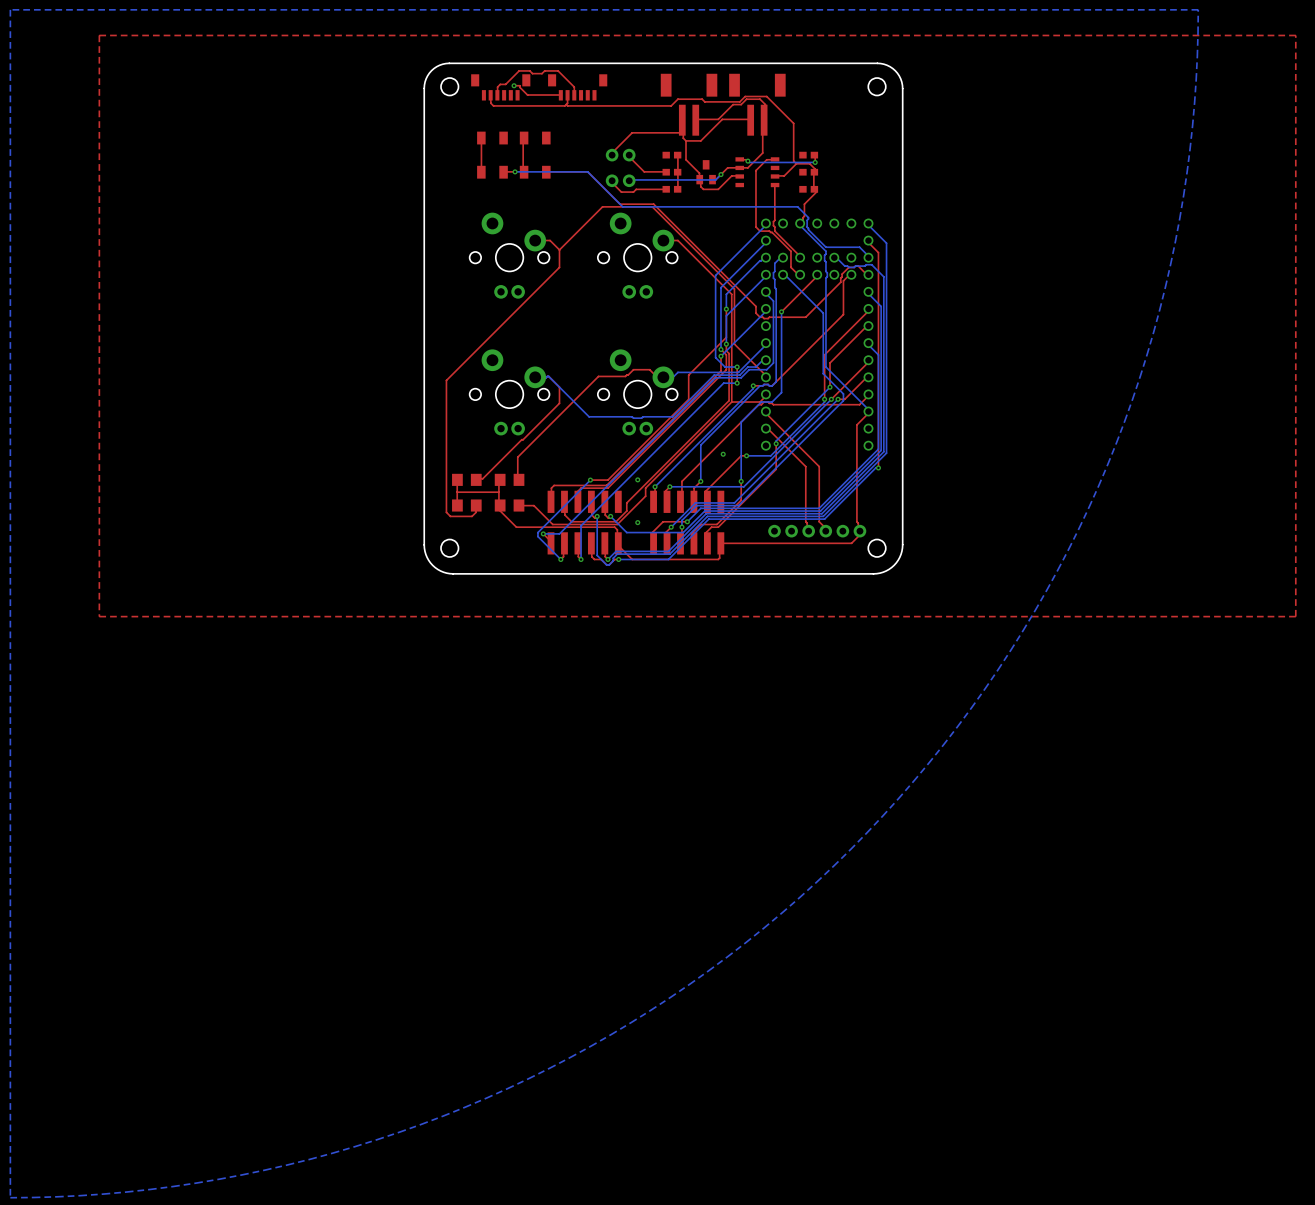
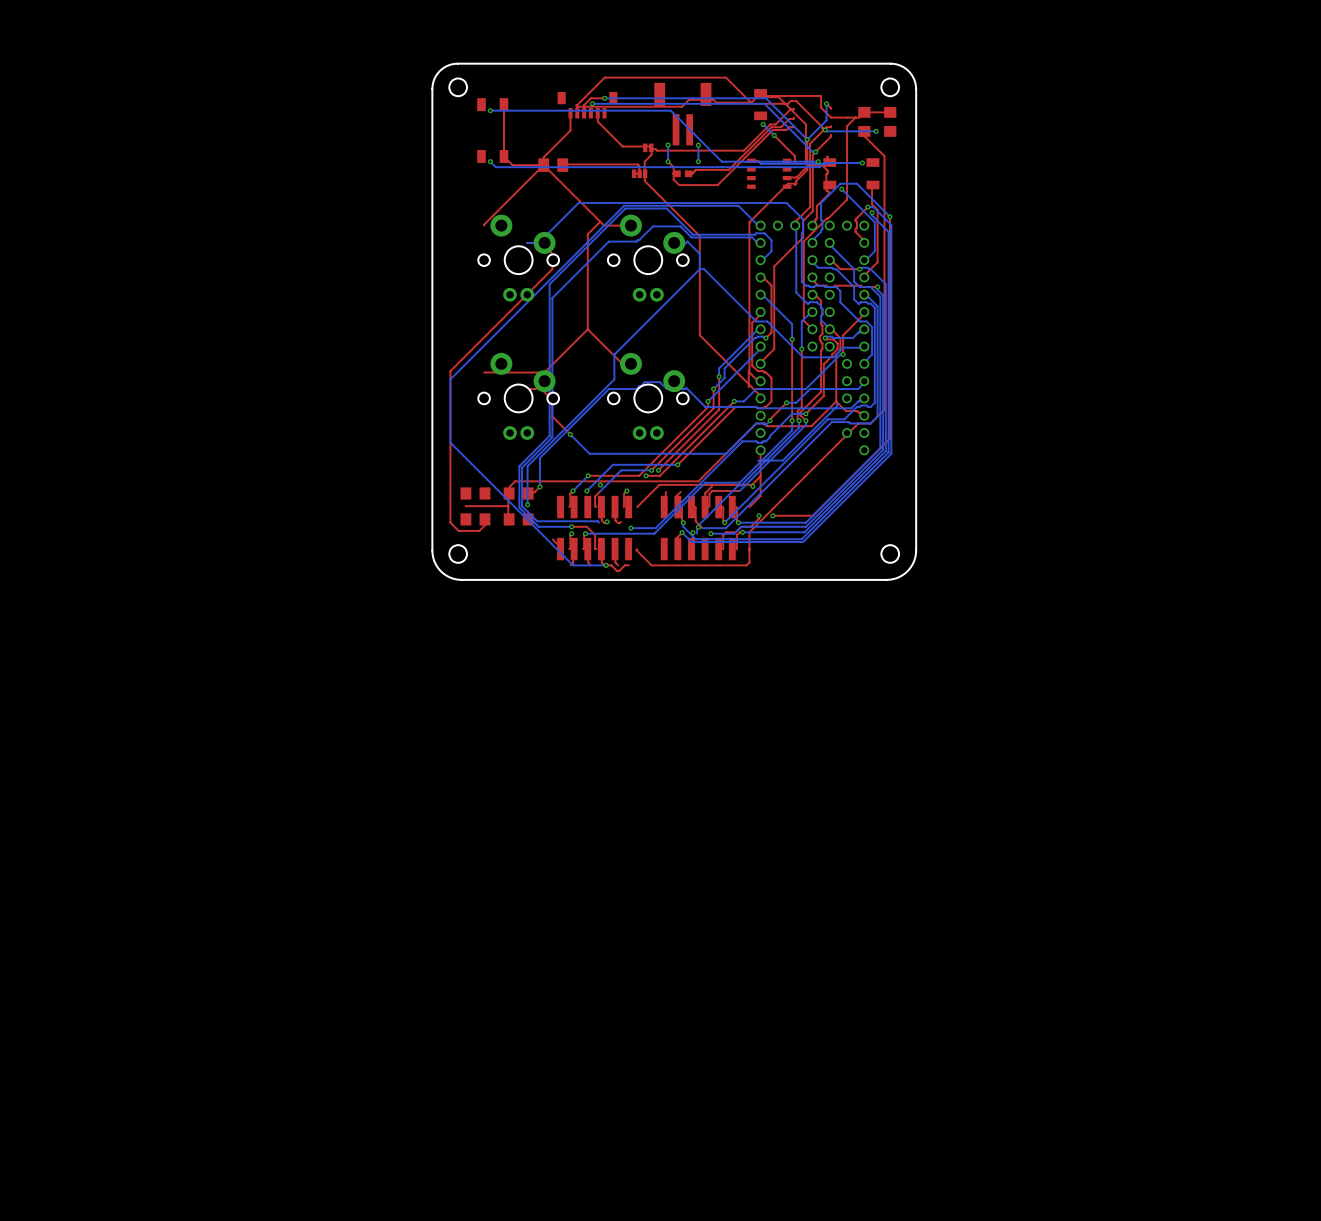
bottom zone outline: (1198, 9) (10, 9) (10, 1197) (126, 1192) (242, 1174) (355, 1146) (464, 1107) (570, 1057) (670, 997) (763, 928) (850, 849) (928, 763) (998, 669) (1057, 569) (1107, 464) (1147, 354) (1175, 241) (1192, 126) (1198, 9) -> none
top zone outline: (1295, 35) (99, 35) (99, 616) (1295, 616) (1295, 35) -> none
top track: (514, 85) (519, 85) (527, 95) (560, 95) -> none
via: (514, 85) -> none
part: (500, 87) -> none
part position: (577, 87) -> (587, 105)
top track: none -> (760, 93) (763, 95) (821, 95) (821, 107) (831, 117) (859, 117) (864, 112) (890, 112)
top track: (567, 95) (567, 103) (564, 105) (493, 105) (490, 103) (490, 95) -> none
top track: (574, 95) (574, 87) (558, 70) (544, 70) (542, 73) (519, 70) (505, 84) (500, 84) (497, 87) (497, 95) -> none
top track: none -> (604, 98) (590, 98) (584, 105) (584, 113)
bottom track: none -> (604, 98) (765, 98) (807, 139) (826, 120) (826, 103)
via: none -> (604, 98)
part: none -> (492, 104)
top track: none -> (503, 104) (503, 156) (512, 165) (543, 165)
bottom track: none -> (592, 103) (764, 103) (812, 152) (815, 152)
via: none -> (592, 103)
part: none -> (760, 104)
top track: none -> (826, 103) (831, 108)
via: none -> (826, 103)
part position: (689, 104) -> (682, 114)
part: (757, 104) -> none
top track: none -> (793, 108) (790, 109) (775, 124) (770, 124) (743, 150) (651, 149)
bottom track: none -> (490, 110) (670, 110) (721, 161) (818, 161)
via: none -> (490, 110)
top track: none -> (570, 113) (570, 130) (543, 157) (543, 165)
top track: none -> (577, 113) (577, 105) (604, 77) (726, 77) (752, 103) (788, 103) (790, 101) (796, 101) (823, 129)
top track: none -> (597, 113) (597, 121) (622, 146) (651, 147)
top track: none -> (793, 117) (789, 118) (781, 127) (771, 127) (728, 169) (695, 169)
top track: none -> (855, 117) (847, 126) (847, 199) (803, 241) (803, 320) (812, 329)
top track: (695, 120) (718, 119) (733, 104) (741, 104) (746, 99) (760, 99) (765, 104) (765, 119) (762, 122) (762, 153) (747, 167) (727, 167) (715, 179) (712, 179) -> none
top track: (750, 120) (722, 119) (700, 140) (686, 140) -> none
part: none -> (864, 121)
part: none -> (890, 121)
bottom track: none -> (763, 124) (774, 135)
via: none -> (763, 124)
top track: none -> (793, 126) (786, 129) (772, 129) (717, 185) (679, 185) (673, 179) (673, 167) (668, 161)
top track: none -> (831, 126) (826, 127) (810, 143) (810, 207) (796, 220) (795, 225)
bottom track: none -> (825, 129) (876, 131)
via: none -> (825, 129)
top track: none -> (864, 131) (865, 136) (884, 156) (884, 409) (870, 423) (858, 423) (850, 431) (847, 431) (845, 435) (749, 532) (749, 562) (746, 565) (651, 565) (637, 549)
via: none -> (876, 131)
top track: none -> (831, 134) (812, 154) (812, 211) (803, 220) (803, 237) (774, 266) (774, 349) (760, 363)
top track: none -> (774, 135) (794, 156) (795, 162)
via: none -> (774, 135)
top track: (481, 138) (481, 172) -> none
part: (492, 138) -> none
top track: (524, 138) (524, 172) -> none
part: (535, 138) -> none
top track: none -> (807, 139) (807, 169) (796, 180) (795, 184) (788, 183) (749, 222) (749, 372) (760, 381)
via: none -> (807, 139)
top track: (686, 140) (686, 159) (699, 173) (700, 186) (703, 189) (718, 189) (731, 175) (739, 176) -> none
top track: (686, 140) (683, 138) (683, 120) (682, 120) (683, 132) (632, 132) (612, 155) -> none
bottom track: none -> (668, 145) (668, 161)
via: none -> (668, 145)
bottom track: none -> (698, 145) (698, 161)
via: none -> (698, 145)
part: none -> (648, 147)
top track: none -> (651, 149) (651, 154) (644, 161) (644, 180) (699, 236) (699, 335) (760, 395) (760, 398)
via: none -> (815, 152)
part: none -> (492, 156)
part: (620, 155) -> none
top track: (629, 155) (644, 171) (666, 172) -> none
part: (671, 155) -> none
top track: (677, 155) (677, 189) -> none
part: (808, 155) -> none
top track: (775, 159) (766, 159) (755, 170) (755, 227) (760, 231) (772, 232) (790, 251) (790, 267) (800, 274) -> (877, 287) (818, 285) (812, 277)
bottom track: none -> (490, 161) (495, 167) (819, 167) (823, 163) (862, 163)
via: none -> (490, 161)
via: none -> (668, 161)
via: none -> (698, 161)
via: none -> (818, 161)
via: (747, 161) -> none
via: none -> (862, 163)
via: (815, 162) -> none
top track: none -> (543, 165) (484, 225)
top track: none -> (543, 165) (604, 225) (630, 225)
part: none -> (553, 165)
top track: none -> (562, 165) (637, 164) (639, 173)
top track: none -> (695, 169) (692, 172) (692, 173) (695, 169)
top track: (515, 171) (503, 172) -> none
bottom track: (515, 171) (587, 171) (622, 206) (797, 206) (808, 217) (808, 229) (825, 247) (859, 247) (868, 257) -> none
via: (515, 171) -> none
part: (492, 172) -> none
part: (535, 172) -> none
top track: (546, 172) (587, 171) (620, 204) (653, 204) (755, 306) (755, 313) (764, 318) (805, 317) (840, 282) (842, 274) (848, 267) (858, 266) (868, 274) -> none
part: none -> (639, 173)
part: (706, 172) -> none
part: (808, 172) -> none
part: none -> (829, 173)
part: none -> (872, 173)
bottom track: (720, 174) (715, 179) (629, 180) -> none
via: (720, 174) -> none
top track: (612, 180) (621, 192) (633, 192) (636, 189) (666, 189) -> none
part: (620, 180) -> none
top track: (775, 185) (774, 231) (800, 257) -> none
bottom track: none -> (841, 189) (874, 222) (874, 251) (864, 260)
via: none -> (841, 189)
part: (671, 189) -> none
part: (808, 189) -> none
top track: none -> (867, 207) (855, 219) (855, 231) (864, 242)
bottom track: none -> (867, 207) (873, 207) (891, 225) (891, 453) (803, 541) (691, 541) (683, 533)
via: none -> (867, 207)
bottom track: none -> (872, 212) (872, 215) (888, 231) (888, 452) (801, 539) (695, 539) (683, 526) (683, 522)
via: none -> (872, 212)
top track: none -> (889, 216) (889, 438) (812, 515) (772, 515)
bottom track: none -> (889, 216) (856, 183) (840, 183) (821, 203) (822, 229) (812, 242)
via: none -> (889, 216)
top track: none -> (600, 221) (587, 234) (587, 329)
bottom track: none -> (760, 225) (757, 225) (738, 205) (624, 205) (450, 379) (450, 442) (573, 565) (606, 565)
bottom track: (765, 223) (715, 275) (715, 357) (725, 367) (737, 367) -> none
bottom track: none -> (795, 225) (796, 292) (807, 303) (816, 302) (821, 306) (821, 320) (829, 329)
bottom track: (800, 223) (825, 251) (825, 367) (868, 411) -> none
bottom track: (868, 223) (886, 243) (886, 453) (823, 516) (707, 516) (669, 554) (617, 554) (613, 560) (606, 564) (597, 555) (597, 516) -> none
top track: none -> (527, 242) (540, 241) (552, 253) (552, 269) (450, 371) (450, 522) (458, 530) (479, 530) (484, 525) (484, 519)
bottom track: none -> (527, 242) (538, 242) (578, 203) (786, 203) (803, 219) (801, 281) (810, 287) (836, 287) (840, 291) (840, 302) (859, 321) (866, 321) (872, 327) (872, 354) (864, 363)
top track: (535, 240) (550, 240) (559, 249) -> none
top track: (663, 240) (677, 240) (731, 294) (731, 402) -> none
bottom track: none -> (674, 242) (684, 244) (687, 241) (699, 253) (699, 269)
bottom track: none -> (760, 242) (752, 237) (691, 237) (680, 226) (652, 226) (636, 241) (608, 241) (552, 298) (552, 437) (522, 467) (522, 506) (537, 521) (599, 522)
bottom track: (765, 240) (720, 287) (720, 349) -> none
bottom track: none -> (829, 242) (854, 269) (854, 281) (859, 287) (870, 287) (880, 296) (880, 448) (805, 522) (738, 522)
top track: (868, 240) (878, 252) (878, 467) -> none
top track: (559, 249) (559, 267) (446, 380) (446, 512) (450, 516) (472, 516) (476, 512) (476, 505) -> none
top track: (559, 249) (602, 206) (652, 206) (734, 288) (734, 344) (765, 377) -> none
bottom track: none -> (760, 260) (771, 251) (771, 240) (764, 233) (692, 234) (666, 208) (625, 208) (549, 284) (549, 435) (519, 466) (519, 507) (538, 526) (571, 526)
bottom track: (765, 257) (760, 260) (726, 294) (726, 309) -> none
bottom track: (783, 257) (774, 263) (773, 272) (776, 288) (776, 381) (772, 385) (760, 385) (700, 445) (700, 481) -> none
bottom track: none -> (812, 260) (818, 267) (836, 269) (854, 287) (854, 299) (858, 303) (866, 302) (874, 307) (874, 402) (870, 406) (856, 406) (844, 419) (827, 419) (724, 522)
top track: none -> (829, 260) (840, 269) (859, 269)
bottom track: (834, 257) (848, 267) (871, 264) (883, 276) (883, 451) (821, 513) (706, 513) (668, 551) (616, 551) (607, 559) -> none
bottom track: none -> (699, 269) (614, 354) (614, 379) (527, 466) (527, 504)
bottom track: none -> (699, 269) (703, 269) (756, 321) (767, 321) (803, 357) (833, 357) (843, 347) (864, 346)
bottom track: none -> (859, 269) (870, 269) (885, 284) (885, 451) (804, 532) (742, 532)
via: none -> (859, 269)
top track: none -> (760, 277) (771, 285) (771, 332) (765, 338)
bottom track: (765, 274) (726, 315) (726, 344) -> none
bottom track: (783, 274) (823, 313) (823, 373) (843, 393) (843, 400) (738, 505) (696, 505) (681, 520) (681, 527) -> none
top track: (817, 274) (781, 311) -> none
top track: (851, 274) (843, 280) (843, 314) (772, 385) (753, 385) -> (864, 277) (877, 262) (877, 209) (872, 204) (872, 184)
bottom track: none -> (877, 287) (877, 289) (883, 295) (883, 449) (805, 526) (741, 526) (734, 533) (710, 533)
via: none -> (877, 287)
bottom track: none -> (760, 294) (792, 324) (792, 339)
bottom track: (765, 291) (773, 301) (773, 362) (766, 369) (749, 369) (741, 377) (715, 377) (559, 533) (543, 533) -> none
top track: none -> (812, 294) (821, 300) (822, 309) (822, 333) (819, 336) (822, 343) (821, 391) (800, 412) (800, 415) (805, 420)
bottom track: none -> (864, 294) (877, 306) (877, 416) (870, 423) (832, 422) (726, 528) (702, 528)
bottom track: (868, 291) (881, 306) (881, 450) (820, 511) (704, 511) (683, 532) (626, 532) (610, 516) -> none
top track: none -> (760, 312) (752, 322) (752, 365) (757, 371) (763, 371) (771, 377) (771, 401) (763, 408) (735, 406) (677, 464)
bottom track: (765, 308) (765, 311) (720, 356) -> none
bottom track: none -> (812, 312) (801, 321) (801, 349)
top track: none -> (864, 312) (843, 335) (843, 354)
top track: (868, 308) (824, 354) (824, 399) -> none
top track: (726, 309) (726, 337) (688, 375) (688, 399) (607, 480) (590, 480) -> none
via: (726, 309) -> none
bottom track: (781, 311) (781, 392) (772, 402) (761, 402) (741, 422) (741, 481) -> none
via: (781, 311) -> none
top track: none -> (587, 329) (630, 372)
top track: none -> (587, 329) (544, 372) (484, 372)
bottom track: none -> (760, 329) (757, 329) (719, 368) (719, 376)
top track: none -> (829, 329) (840, 338) (840, 350) (836, 354) (836, 401)
bottom track: none -> (864, 329) (852, 338) (825, 338)
top track: (868, 326) (830, 362) (830, 387) -> none
bottom track: none -> (765, 338) (754, 338) (724, 368) (724, 377) (713, 389)
via: none -> (765, 338)
part: none -> (812, 337)
top track: none -> (825, 338) (833, 339) (837, 343) (837, 349) (823, 364) (823, 395) (805, 413)
via: none -> (825, 338)
part: (817, 334) -> none
top track: none -> (792, 339) (792, 420)
via: none -> (792, 339)
bottom track: none -> (760, 346) (760, 349) (708, 401)
bottom track: (765, 343) (738, 372) (677, 372) (673, 376) (663, 377) -> none
bottom track: (868, 343) (878, 354) (878, 449) (819, 508) (700, 508) (687, 521) -> none
top track: (726, 344) (726, 350) (729, 353) (729, 400) (626, 502) (626, 511) (616, 521) (571, 521) (564, 515) (564, 501) -> none
via: (726, 344) -> none
top track: none -> (801, 349) (801, 406) (797, 411) (799, 420)
via: none -> (801, 349)
top track: (720, 349) (726, 354) (726, 369) (607, 488) (581, 488) (578, 490) (577, 501) -> none
via: (720, 349) -> none
bottom track: none -> (843, 354) (840, 354) (805, 389) (756, 389) (743, 401) (734, 401)
via: none -> (843, 354)
top track: (720, 356) (720, 371) (606, 485) (554, 485) (551, 488) (551, 501) -> none
via: (720, 356) -> none
bottom track: (765, 360) (762, 360) (755, 367) (747, 367) (739, 375) (714, 375) (672, 416) (589, 416) (548, 376) (535, 377) -> none
top track: (868, 360) (831, 399) -> none
via: (737, 367) -> none
top track: none -> (719, 376) (719, 409) (658, 470)
via: none -> (719, 376)
top track: (535, 377) (548, 376) (559, 387) (559, 403) (482, 478) (476, 479) -> none
top track: (663, 377) (656, 376) (649, 369) (633, 369) (625, 376) (598, 376) (517, 457) (518, 479) -> none
bottom track: none -> (864, 381) (858, 389) (810, 389) (796, 402) (786, 402)
top track: (868, 377) (844, 399) (838, 399) -> none
bottom track: (737, 383) (723, 383) (581, 525) (581, 559) -> none
via: (737, 383) -> none
top track: none -> (527, 389) (535, 389) (538, 386) (552, 400) (552, 416) (570, 434)
top track: none -> (713, 389) (713, 408) (651, 470)
via: none -> (713, 389)
bottom track: (753, 385) (753, 388) (655, 486) -> none
via: (753, 385) -> none
bottom track: (830, 387) (776, 441) (776, 443) -> none
via: (830, 387) -> none
top track: (765, 394) (760, 402) (731, 402) -> none
bottom track: none -> (864, 398) (851, 408) (705, 406) (686, 387) (666, 389) (659, 382) (644, 382) (636, 389) (608, 389) (540, 457) (540, 486)
top track: (868, 394) (859, 404) (773, 404) (768, 402) (758, 404) (681, 481) (680, 501) -> none
top track: none -> (708, 401) (708, 406) (639, 475) (588, 475)
via: none -> (708, 401)
top track: none -> (734, 401) (659, 475) (646, 475)
via: none -> (734, 401)
top track: none -> (836, 401) (845, 411) (856, 411) (864, 415)
top track: none -> (836, 401) (811, 426) (767, 426) (764, 423) (756, 423) (698, 481) (515, 481) (509, 486) (508, 493) (509, 519)
top track: none -> (786, 402) (770, 420)
via: none -> (786, 402)
via: (824, 399) -> none
bottom track: (831, 399) (743, 486) (669, 486) -> none
via: (831, 399) -> none
bottom track: (838, 399) (734, 502) (695, 502) (671, 527) -> none
via: (838, 399) -> none
top track: (731, 402) (645, 488) (645, 496) (617, 524) (552, 524) (533, 505) (518, 505) -> none
bottom track: none -> (805, 413) (792, 413) (765, 441) (742, 441) (655, 528) (630, 528)
via: none -> (805, 413)
top track: (765, 411) (819, 466) (819, 521) (825, 531) -> none
top track: (868, 411) (856, 424) (856, 521) (859, 531) (859, 535) (851, 543) (720, 543) (718, 559) (632, 559) (617, 544) (617, 529) (614, 527) (516, 527) (500, 511) (500, 479) -> none
bottom track: none -> (770, 420) (765, 424) (756, 423) (726, 453) (589, 453) (570, 434)
via: none -> (770, 420)
bottom track: none -> (792, 420) (792, 430) (739, 482) (705, 482) (654, 533) (585, 533)
via: none -> (792, 420)
bottom track: none -> (799, 420) (799, 427) (697, 526) (697, 533)
via: none -> (799, 420)
bottom track: none -> (805, 420) (805, 424) (739, 490)
via: none -> (805, 420)
top track: (765, 428) (805, 466) (805, 521) (808, 531) -> none
via: none -> (570, 434)
top track: (776, 443) (776, 469) (718, 527) (711, 527) (706, 532) (707, 543) -> none
via: (776, 443) -> none
top track: none -> (760, 450) (760, 496) (749, 507)
via: (723, 454) -> none
top track: (746, 455) (741, 455) (706, 490) (707, 501) -> none
via: (746, 455) -> none
bottom track: none -> (677, 464) (613, 464) (586, 490)
via: none -> (677, 464)
bottom track: none -> (651, 470) (621, 470) (600, 490)
via: none -> (651, 470)
via: none -> (658, 470)
bottom track: (878, 467) (875, 467) (824, 519) (708, 519) (668, 559) (618, 559) -> none
via: (878, 467) -> none
bottom track: none -> (588, 475) (573, 490)
via: none -> (588, 475)
via: none -> (646, 475)
top track: none -> (760, 476) (751, 484) (659, 484) (637, 507)
top track: (457, 479) (457, 505) -> none
part: (466, 479) -> none
part: (509, 479) -> none
via: (637, 479) -> none
bottom track: (590, 480) (537, 532) (537, 536) (560, 559) -> none
top track: none -> (540, 486) (534, 492) (528, 493)
via: none -> (540, 486)
via: (700, 481) -> none
top track: (741, 481) (741, 500) (716, 524) (700, 524) (692, 532) (693, 543) -> none
top track: none -> (573, 490) (570, 493) (569, 507)
via: none -> (573, 490)
via: none -> (586, 490)
top track: none -> (600, 490) (595, 496) (596, 507)
top track: none -> (626, 490) (624, 493) (623, 507)
via: none -> (626, 490)
top track: none -> (739, 490) (712, 490) (709, 493) (708, 507)
via: (655, 486) -> none
via: (669, 486) -> none
part: none -> (475, 493)
part: none -> (518, 493)
top track: (498, 492) (457, 492) -> none
via: none -> (527, 504)
top track: none -> (508, 506) (465, 506)
top track: none -> (681, 507) (683, 522)
top track: none -> (695, 507) (695, 521) (702, 528)
top track: none -> (722, 507) (724, 522)
top track: none -> (735, 507) (738, 522)
part: (466, 505) -> none
part: (509, 505) -> none
top track: none -> (759, 515) (759, 518) (750, 526) (741, 526) (735, 532) (726, 532) (723, 535) (722, 549)
via: none -> (759, 515)
via: none -> (772, 515)
part: none -> (475, 519)
part: none -> (518, 519)
via: (610, 516) -> none
via: none -> (683, 522)
via: none -> (724, 522)
via: none -> (738, 522)
top track: none -> (571, 526) (586, 526) (595, 535) (596, 549)
via: none -> (571, 526)
top track: (687, 521) (663, 521) (652, 532) (653, 543) -> none
via: none -> (630, 528)
via: (637, 522) -> none
top track: none -> (742, 532) (737, 535) (735, 549)
via: none -> (742, 532)
top track: none -> (571, 533) (569, 549)
via: none -> (571, 533)
top track: none -> (585, 533) (582, 549)
via: none -> (585, 533)
via: none -> (710, 533)
part: (817, 531) -> none
via: (543, 533) -> none
via: (560, 559) -> none
via: (581, 559) -> none
via: none -> (606, 565)
via: (607, 559) -> none
via: (618, 559) -> none

